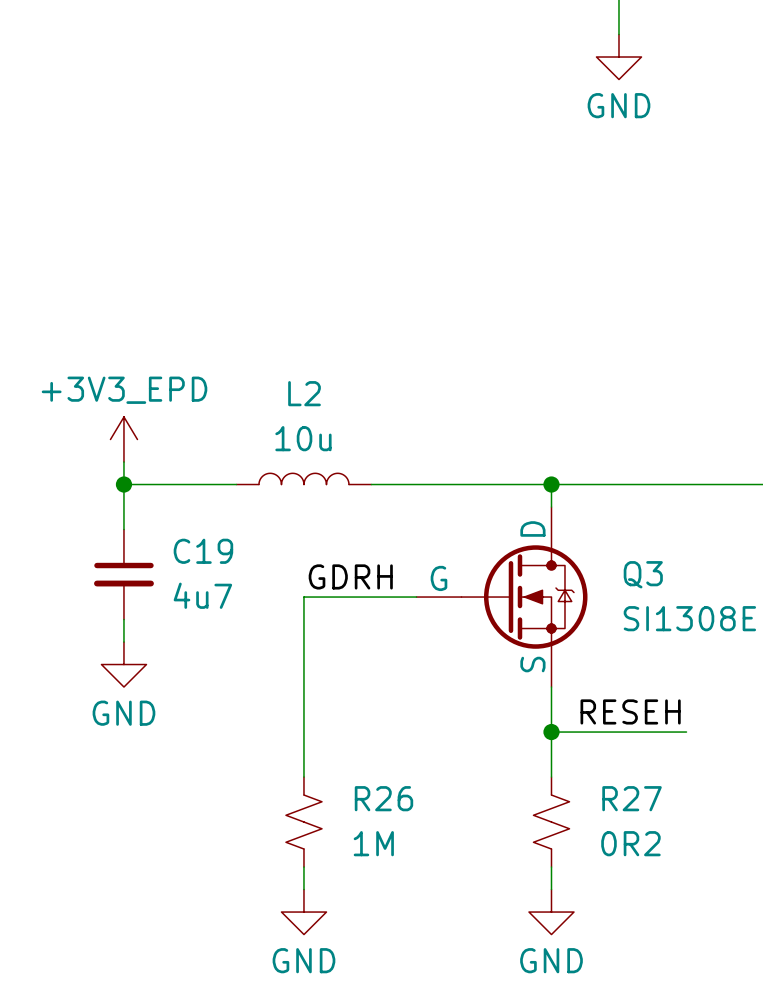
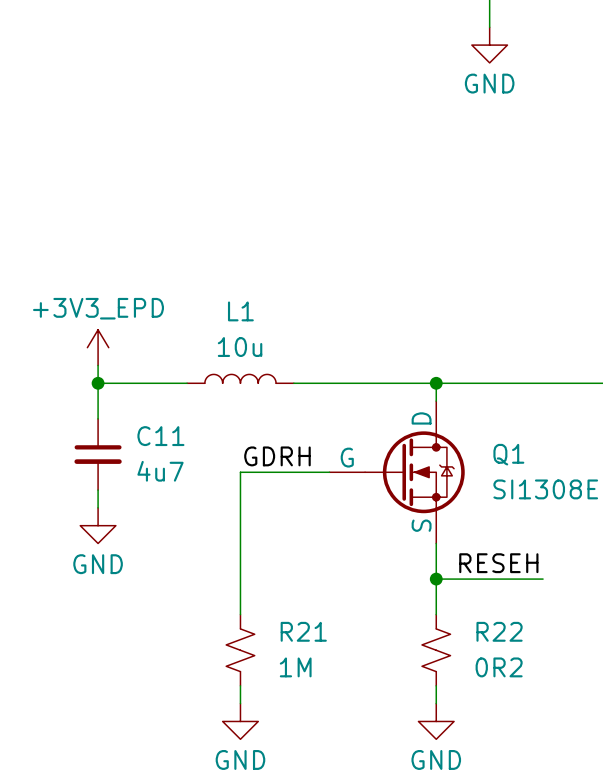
L2 name: L2 (304, 393) -> L1 (240, 311)
C19 name: C19 (203, 551) -> C11 (160, 436)
Q3 name: Q3 (643, 574) -> Q1 (508, 454)
R26 name: R26 (383, 798) -> R21 (303, 631)
R27 name: R27 (632, 798) -> R22 (499, 631)

